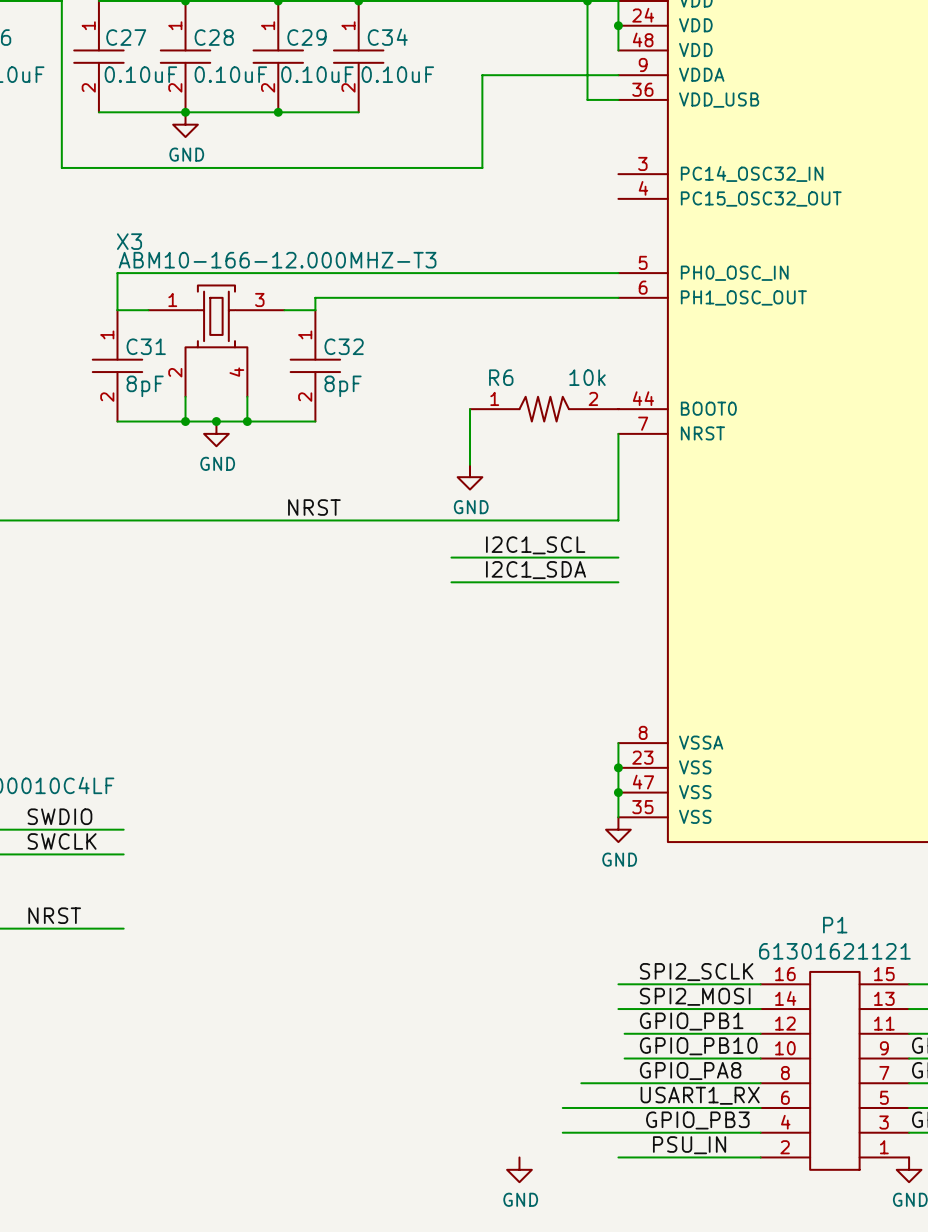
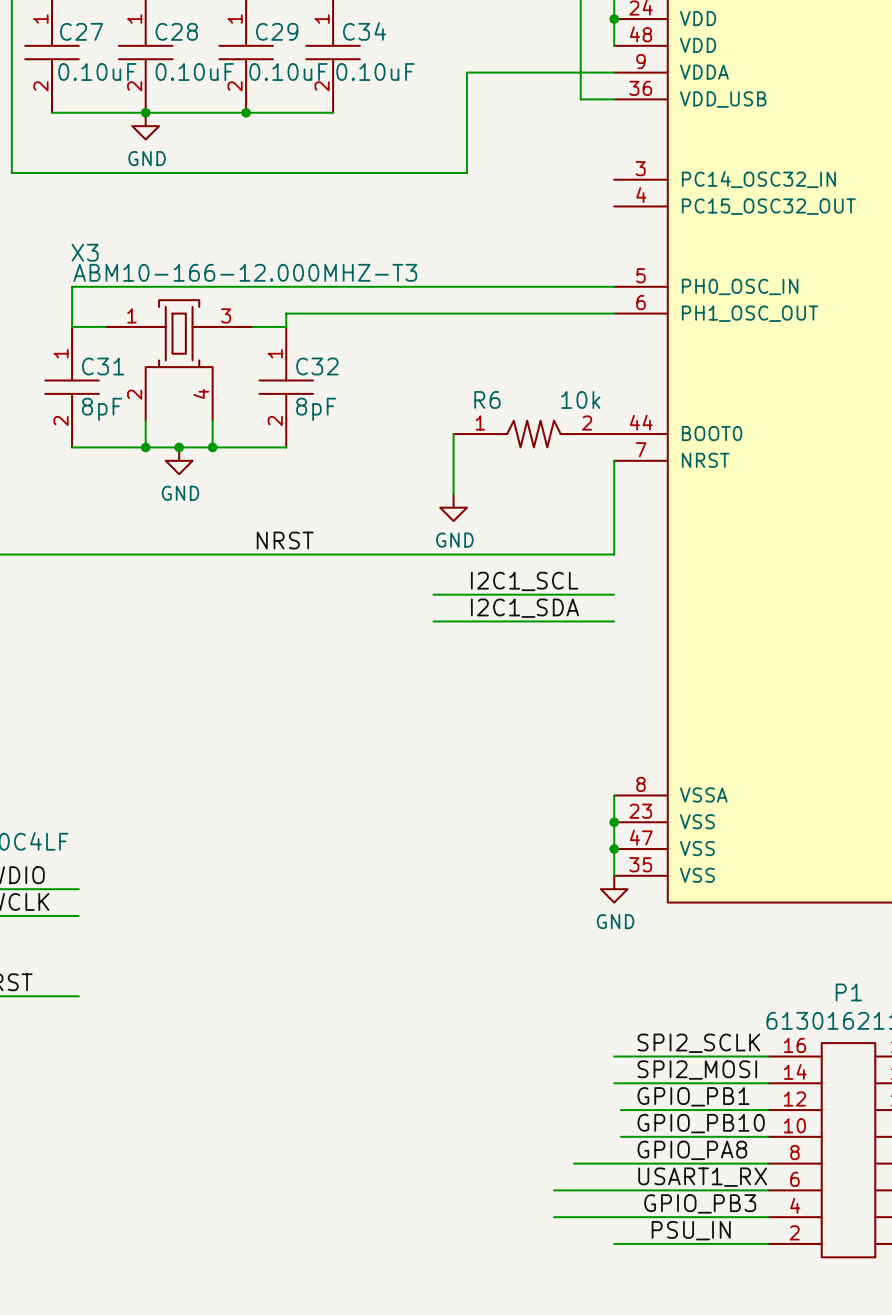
power symbol: GND (519, 1169) -> none

